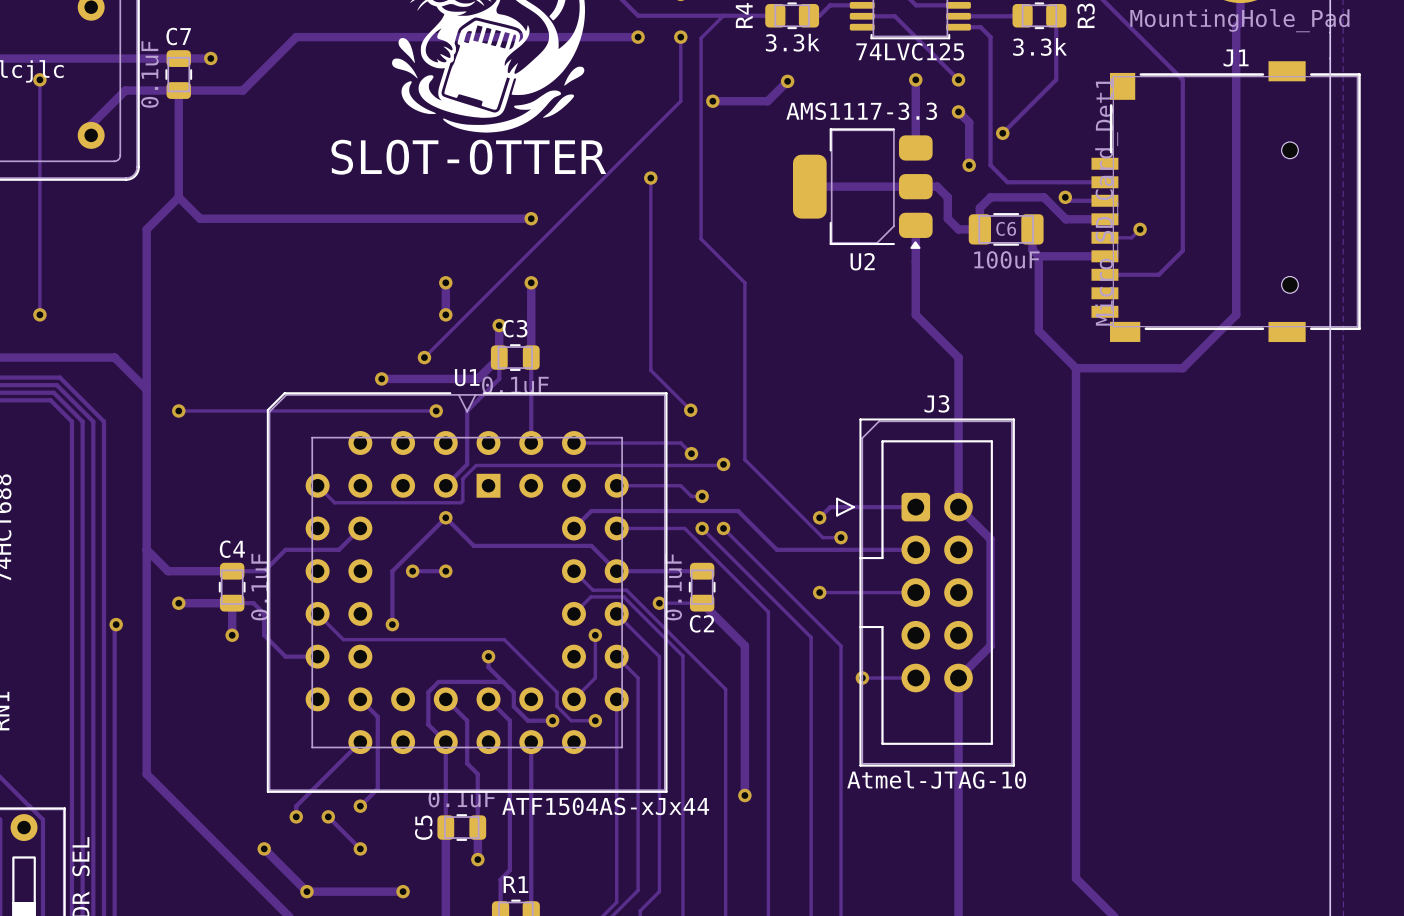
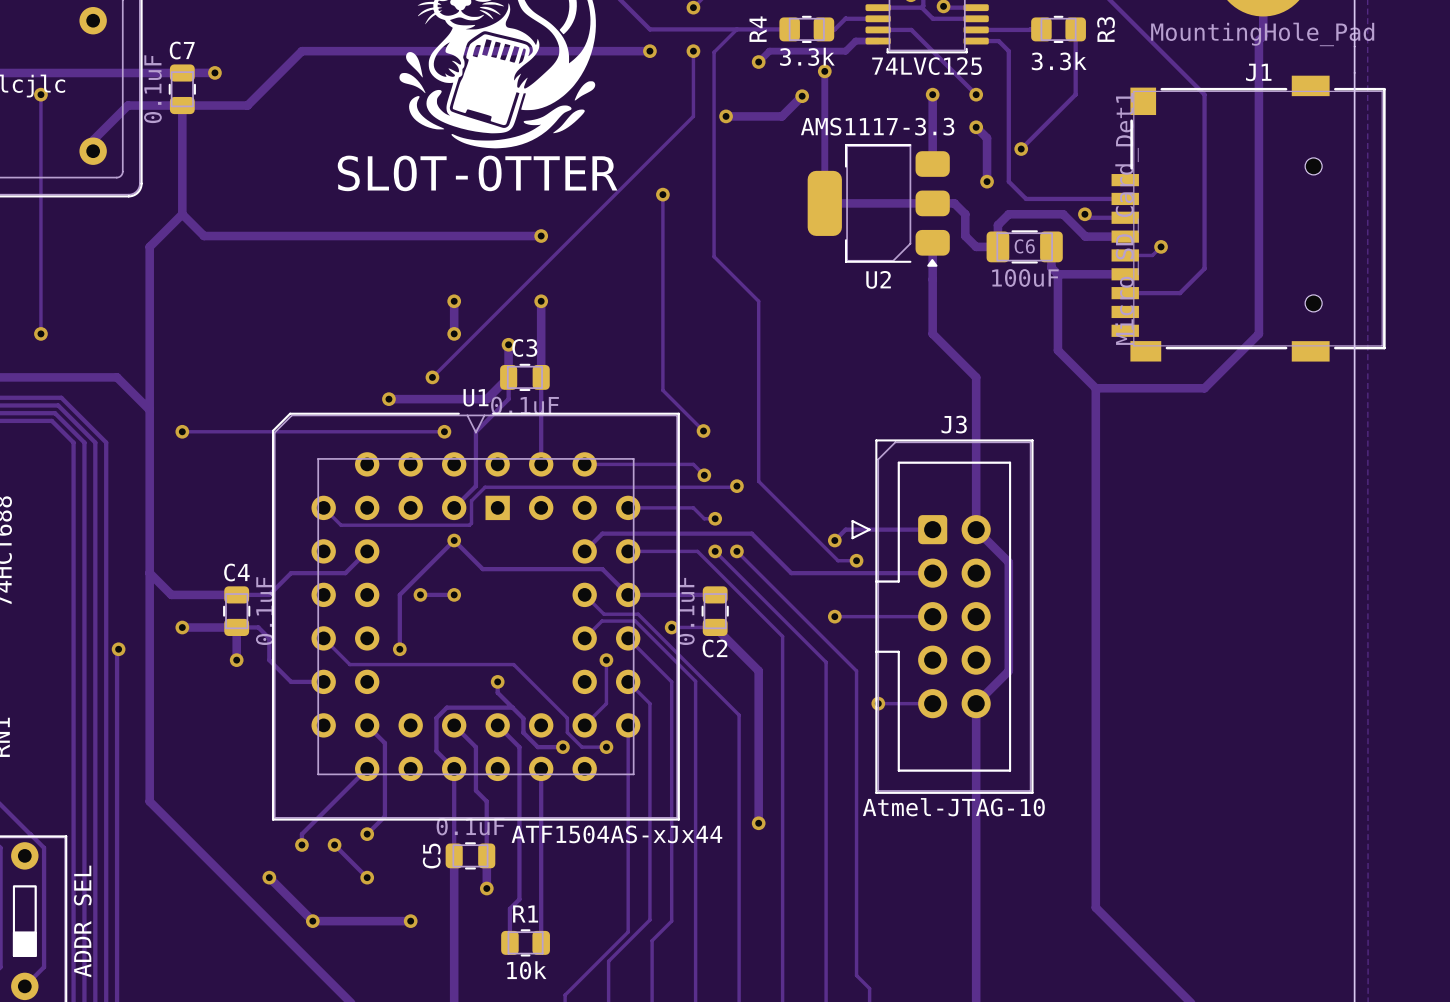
track: none -> (878, 41) (855, 41) (845, 51) (769, 51) (758, 62)
via: none -> (758, 62)
via: none -> (824, 71)
track: none -> (824, 72) (824, 203)

